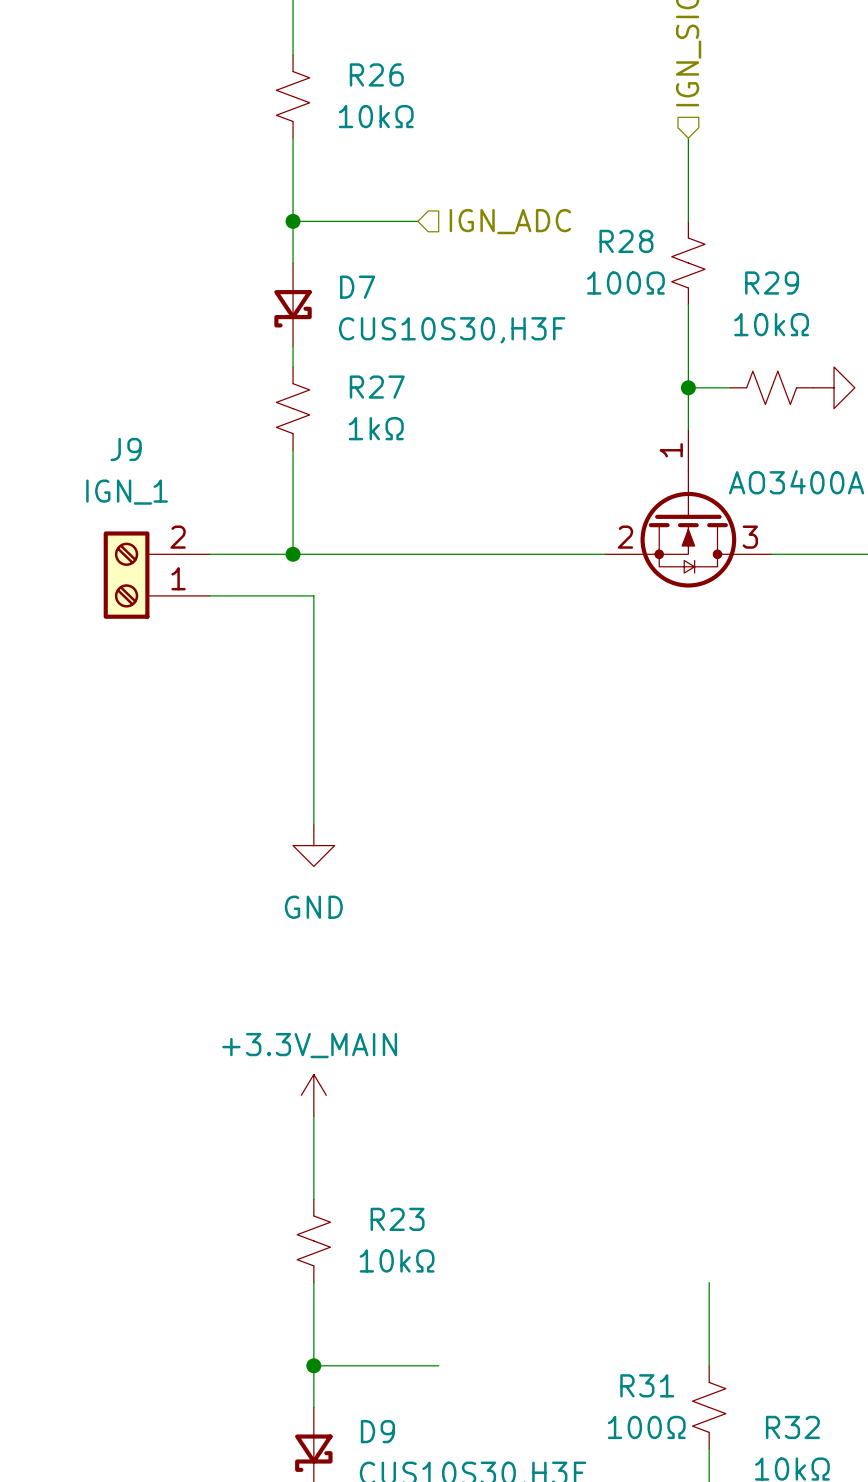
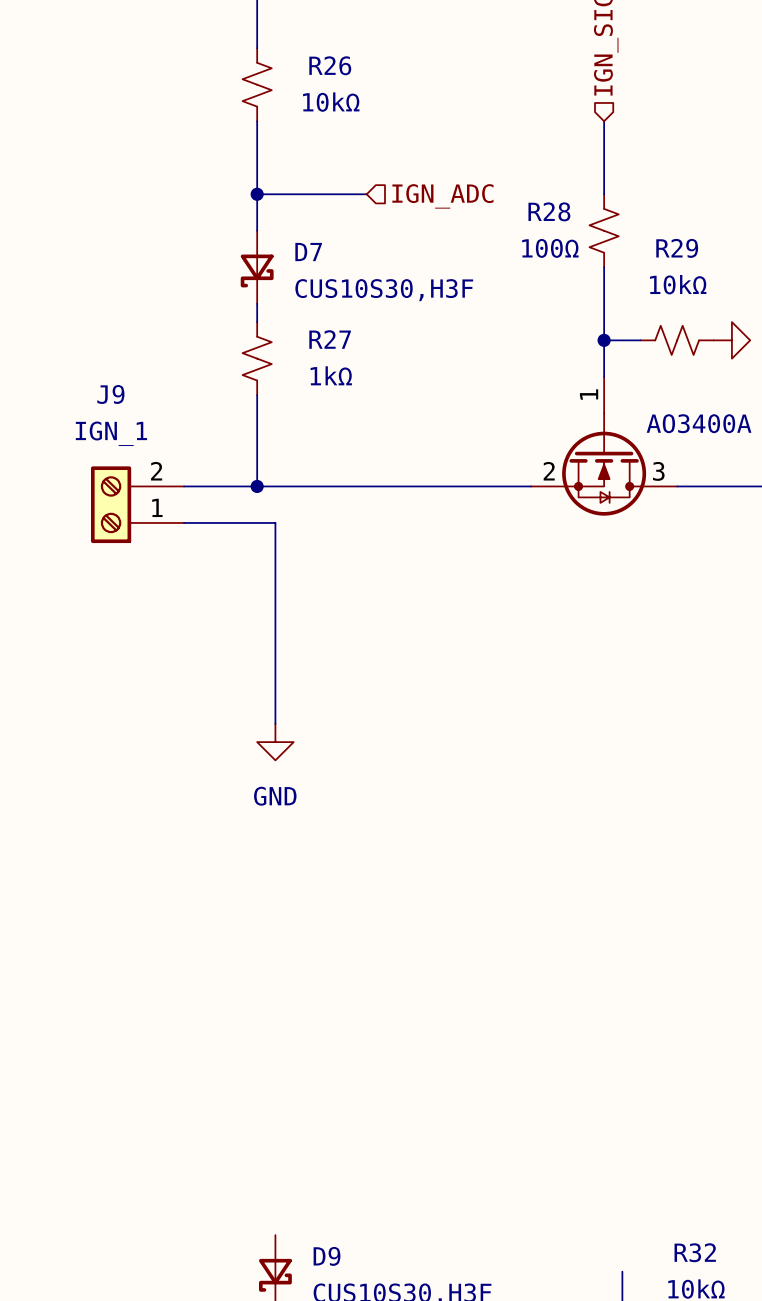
power symbol: +3.3V_MAIN (313, 1095) -> none
wire: (313, 1116) (313, 1199) -> none
R23: 10kΩ (313, 1240) -> none
wire: (313, 1282) (313, 1407) -> none
wire: (709, 1282) (709, 1365) -> none
wire: (313, 1365) (438, 1365) -> none
junction: (313, 1365) -> none
R31: 100Ω (709, 1407) -> none

